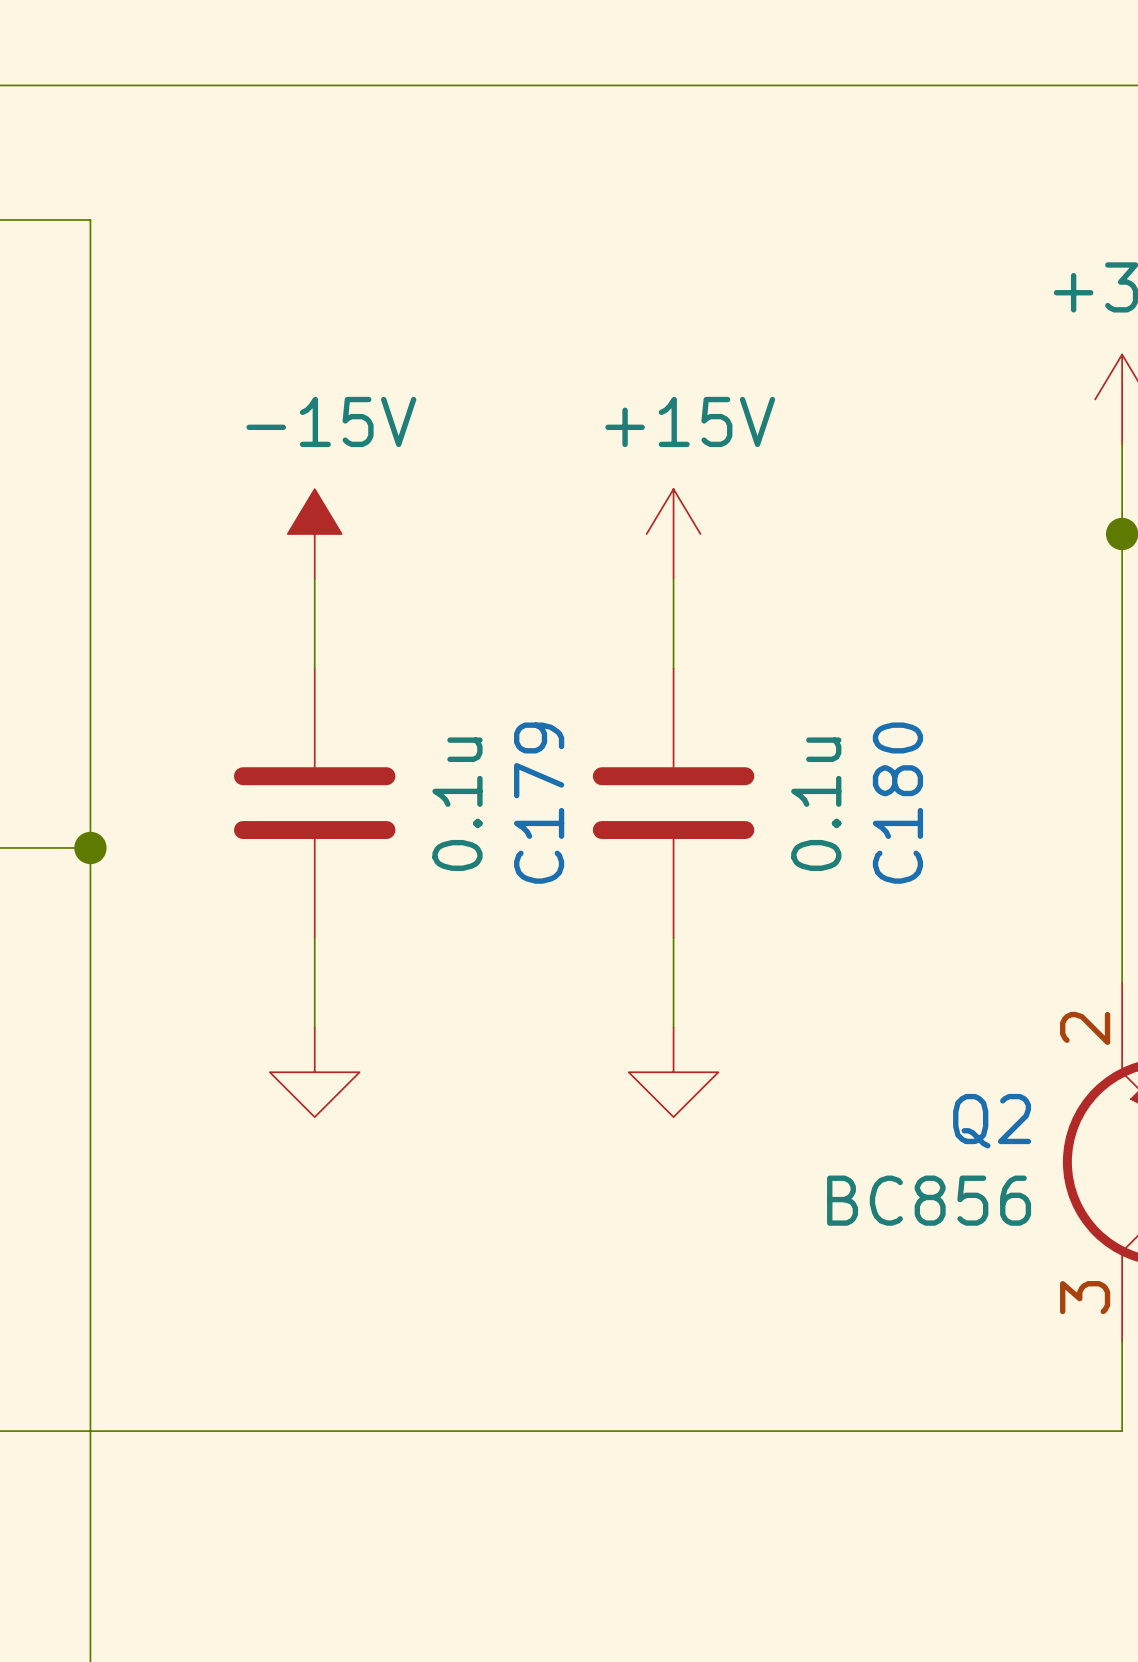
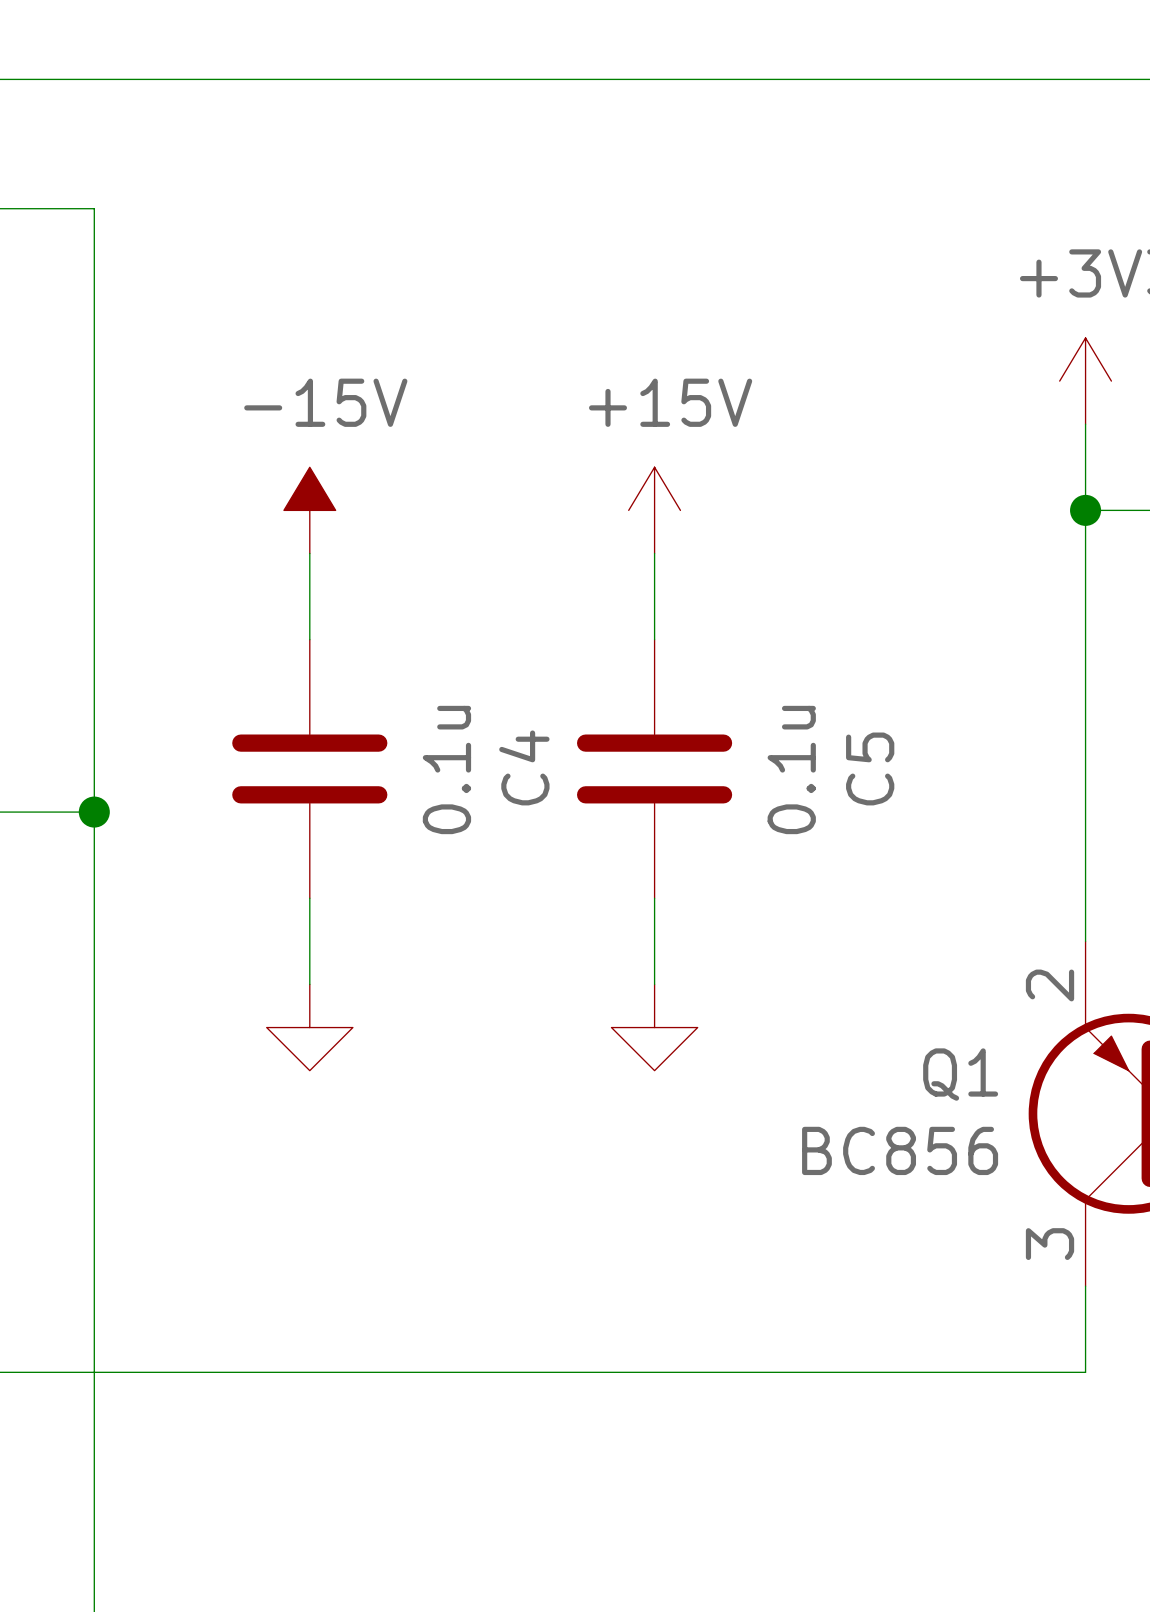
C179 name: C179 (539, 803) -> C4 (524, 767)
C180 name: C180 (897, 803) -> C5 (870, 768)
Q2 name: Q2 (992, 1121) -> Q1 (960, 1074)

